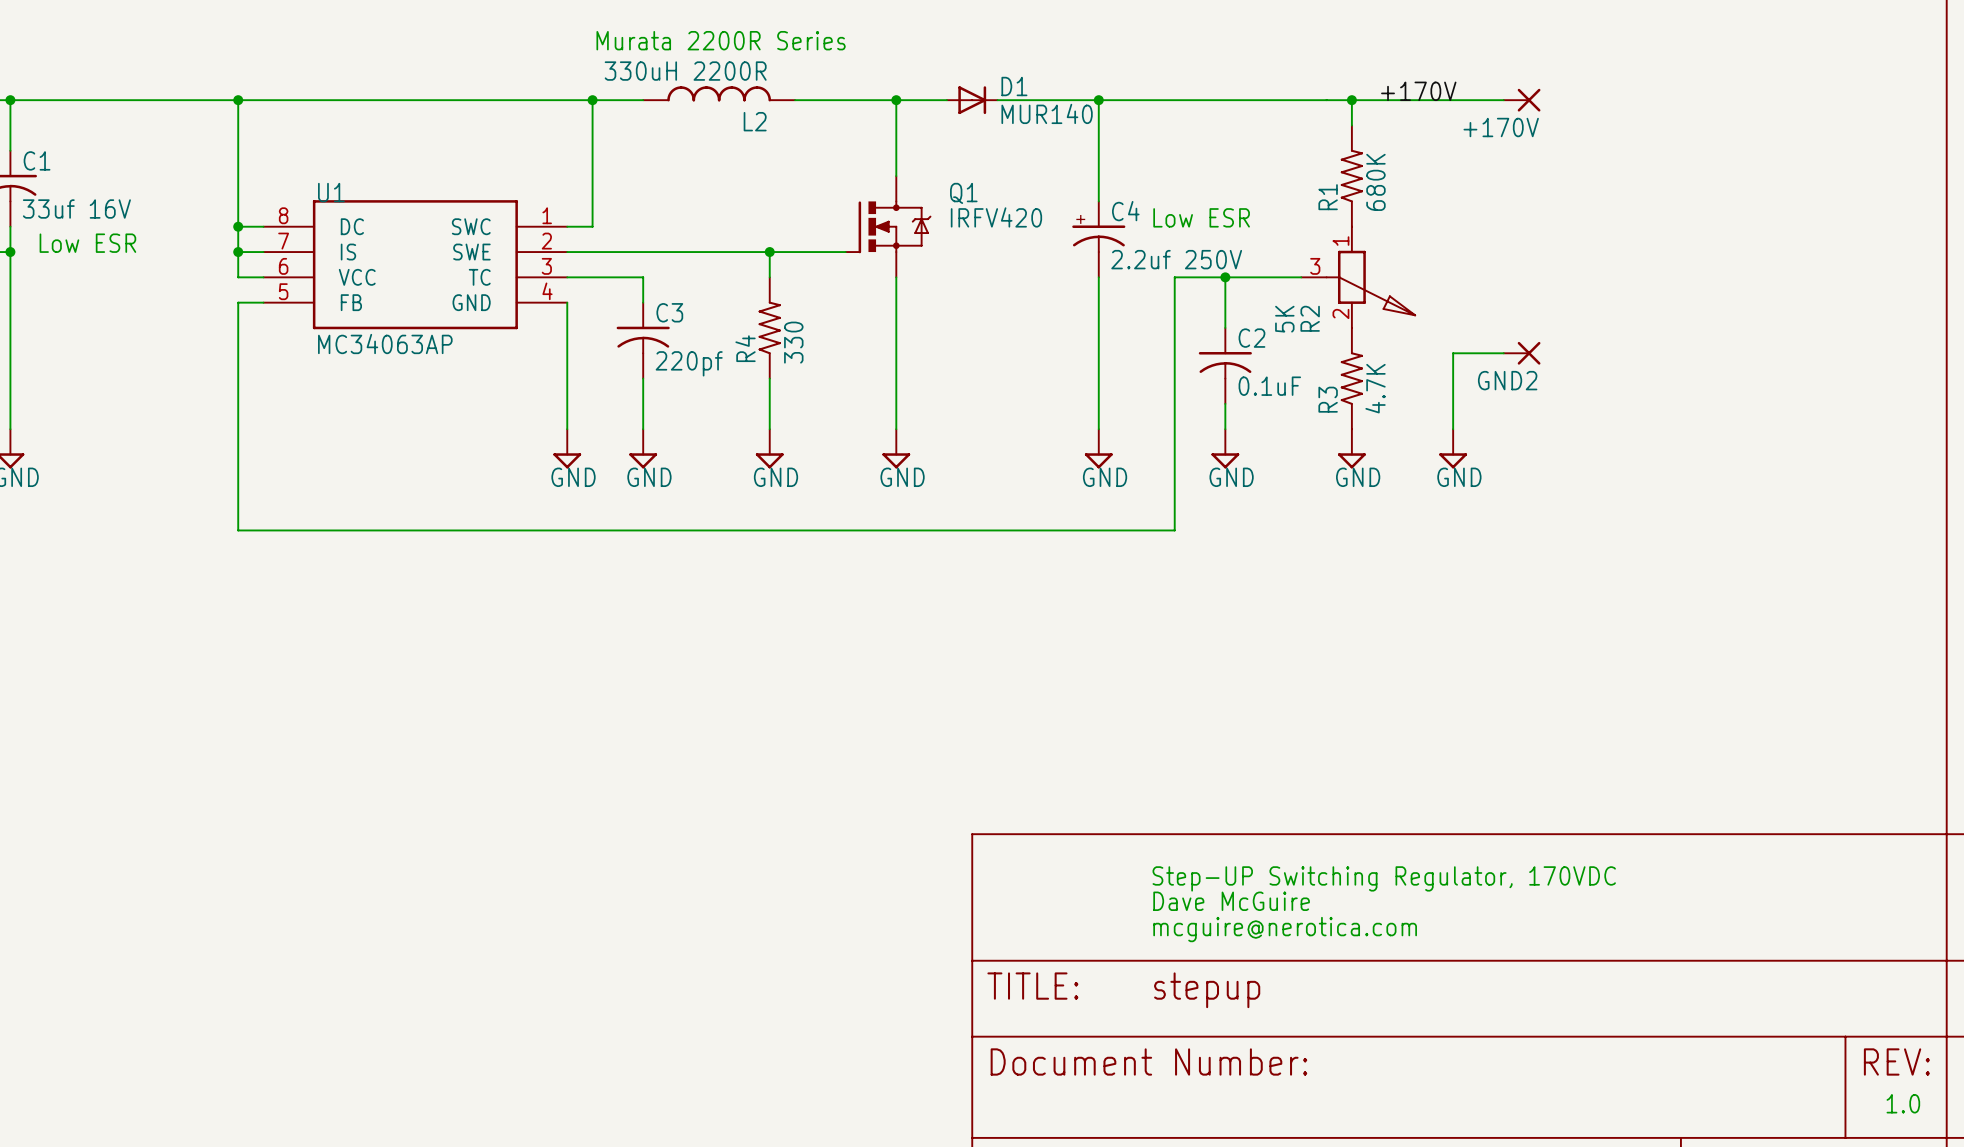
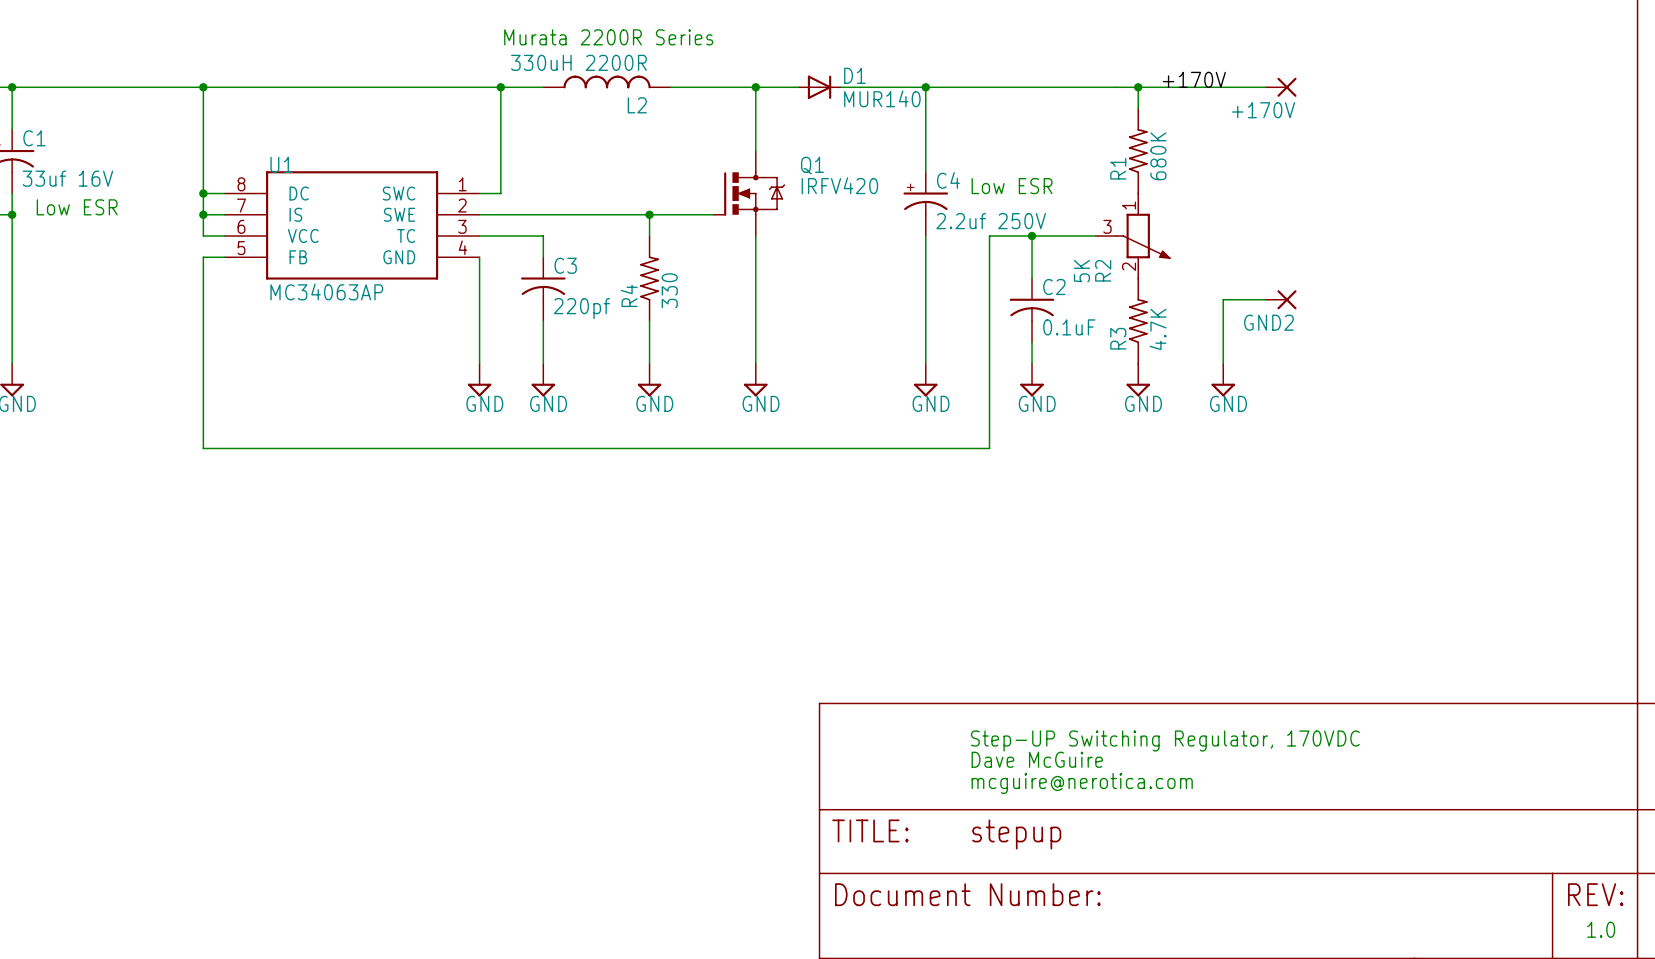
R2 symbol: [1301, 226, 1416, 328] -> [1095, 193, 1171, 279]

